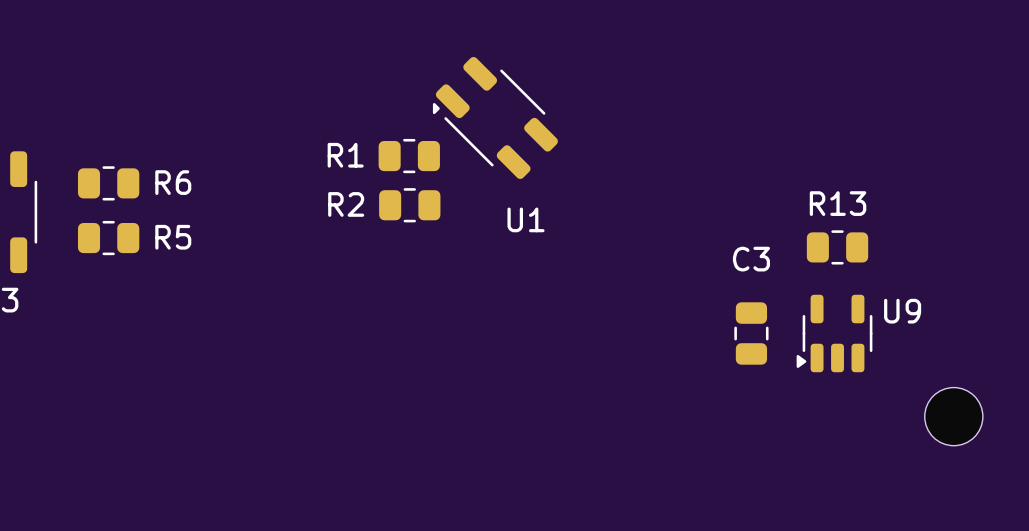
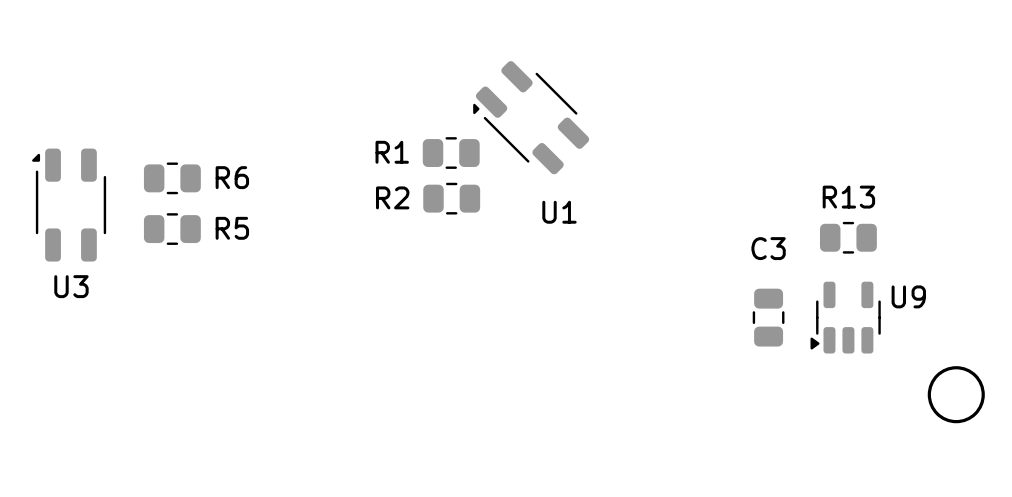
round board edge: none -> [927, 366, 985, 424]
part: (953, 416) -> none

